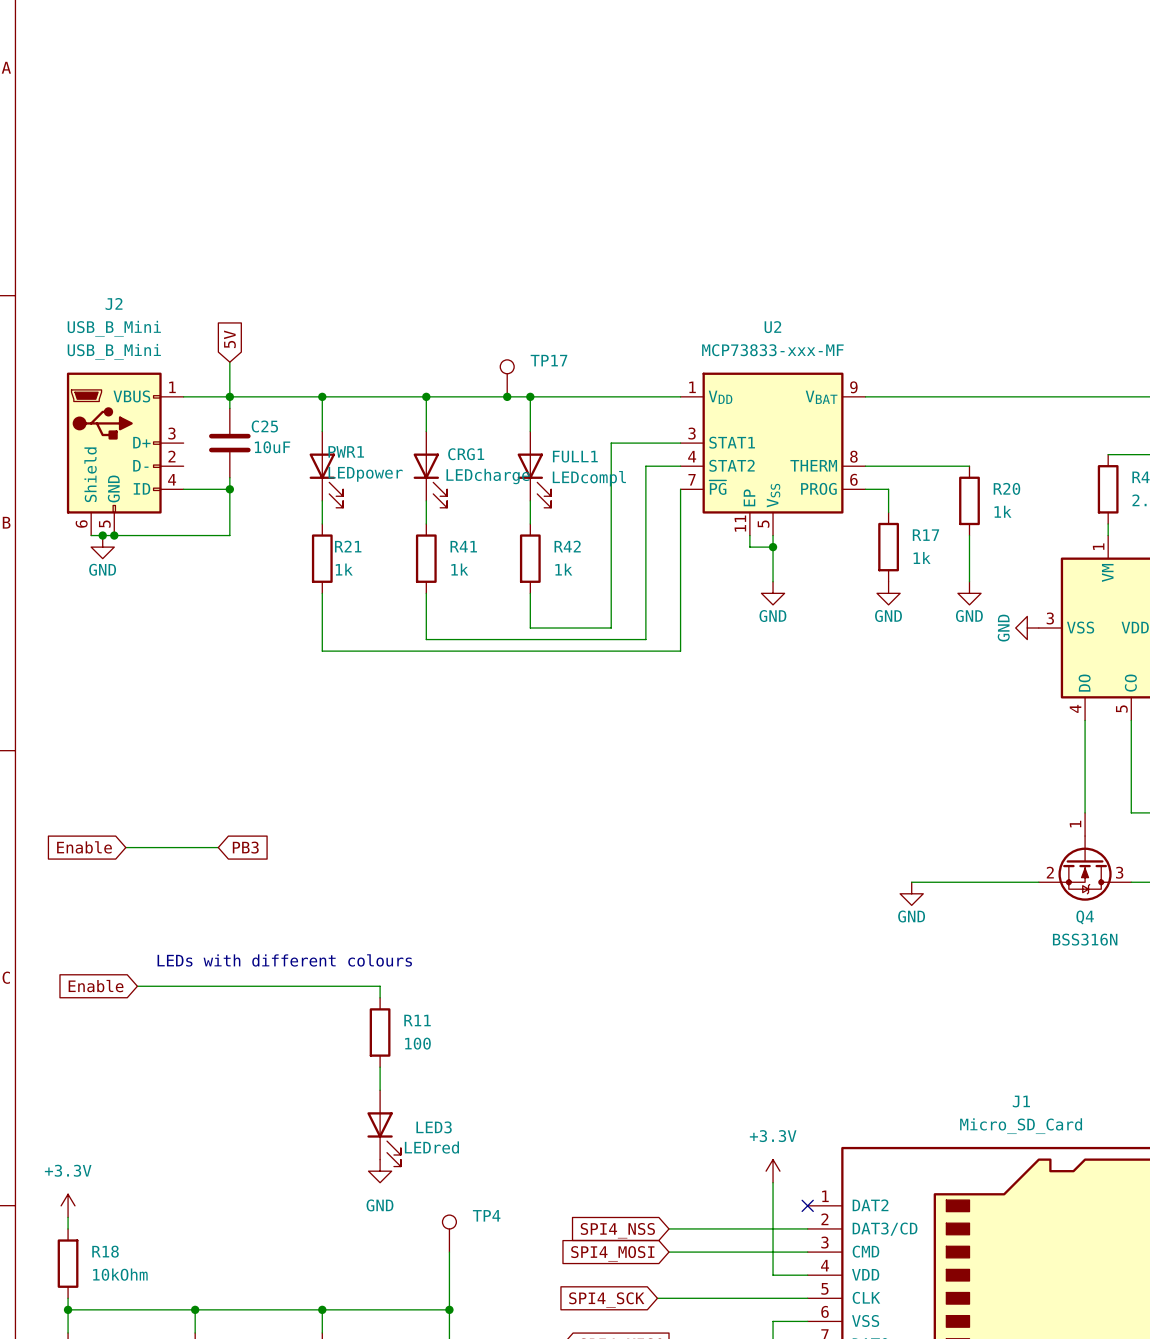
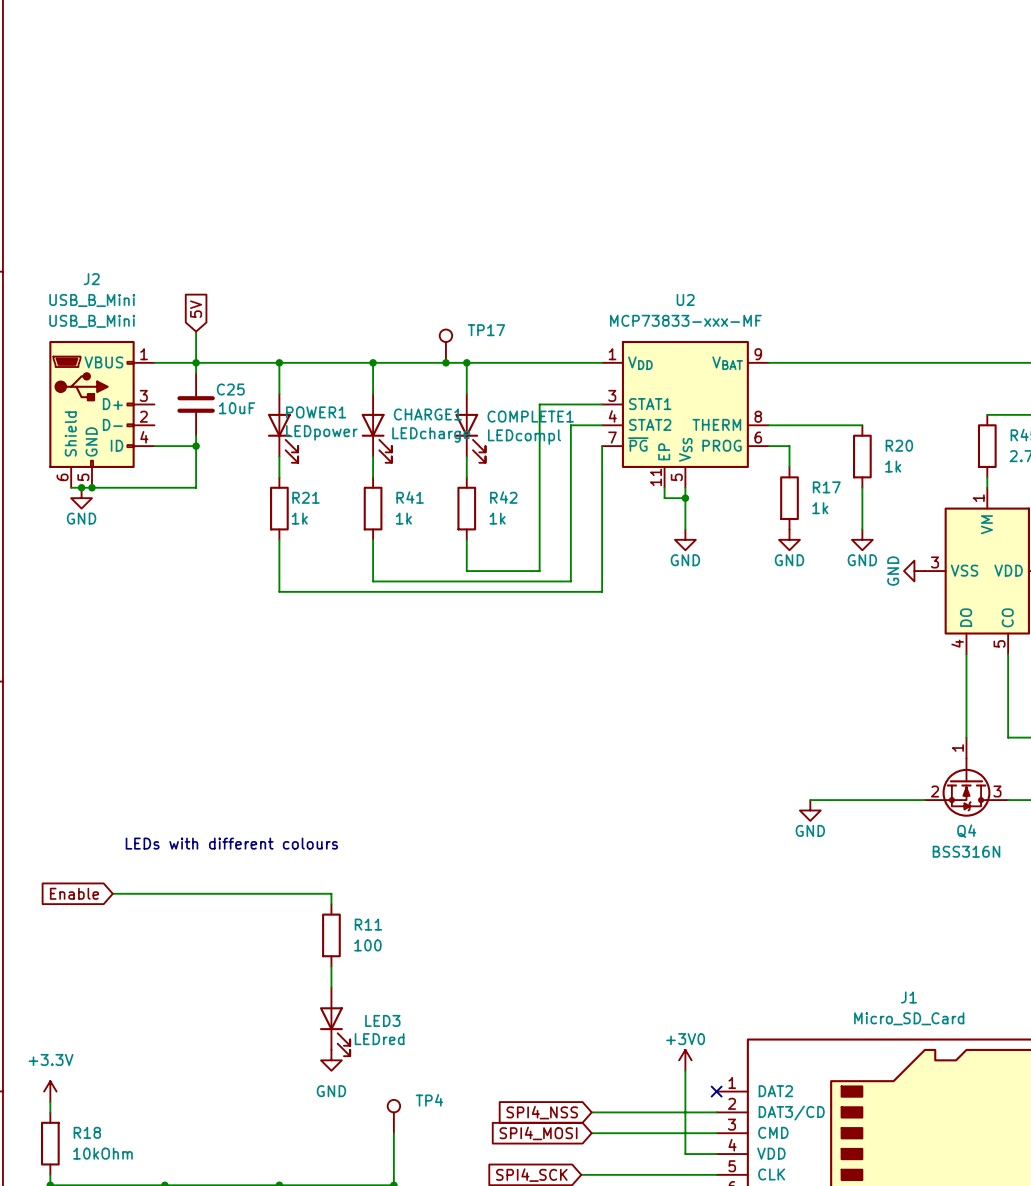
PWR1 name: PWR1 (346, 451) -> POWER1 (316, 412)
CRG1 name: CRG1 (466, 454) -> CHARGE1 (427, 414)
FULL1 name: FULL1 (575, 456) -> COMPLETE1 (530, 416)
global label: Enable (84, 847) -> none
wire: (125, 847) (218, 847) -> none
global label: PB3 (245, 847) -> none
text position: LEDs with different colours (284, 960) -> LEDs with different colours (231, 843)
power symbol: +3.3V (773, 1171) -> +3V0 (685, 1060)

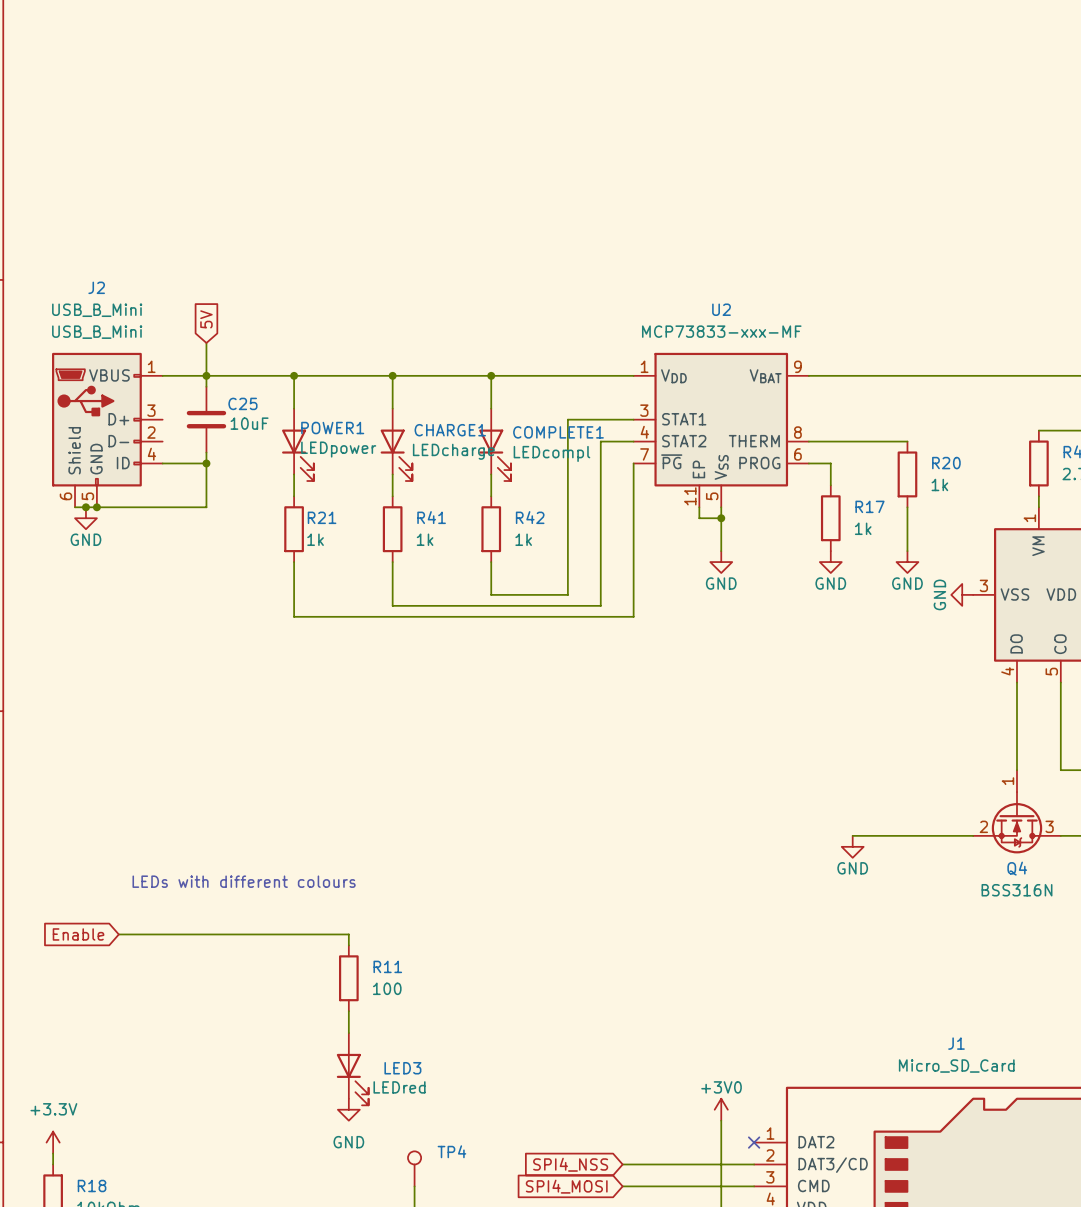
TP17: (445, 346) -> none
junction: (445, 362) -> none

